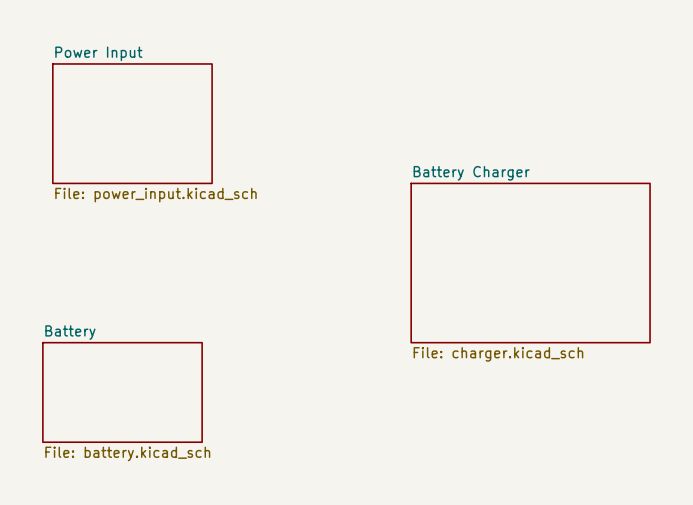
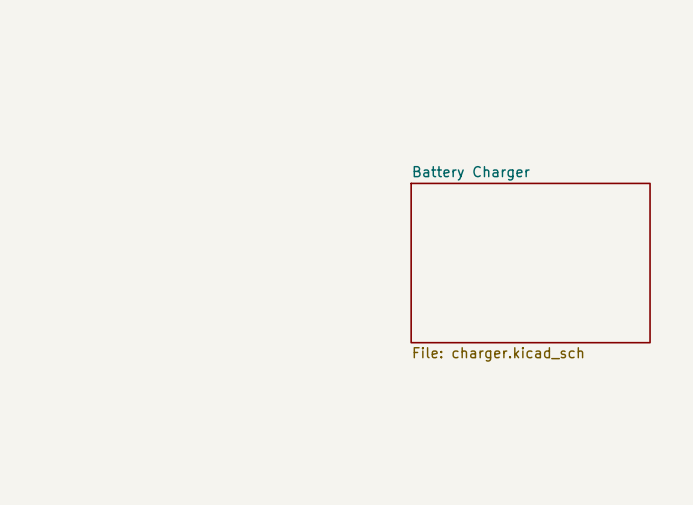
sheet Power Input: File: power_input.kicad_sch (132, 123) -> none
sheet Battery: File: battery.kicad_sch (122, 392) -> none

